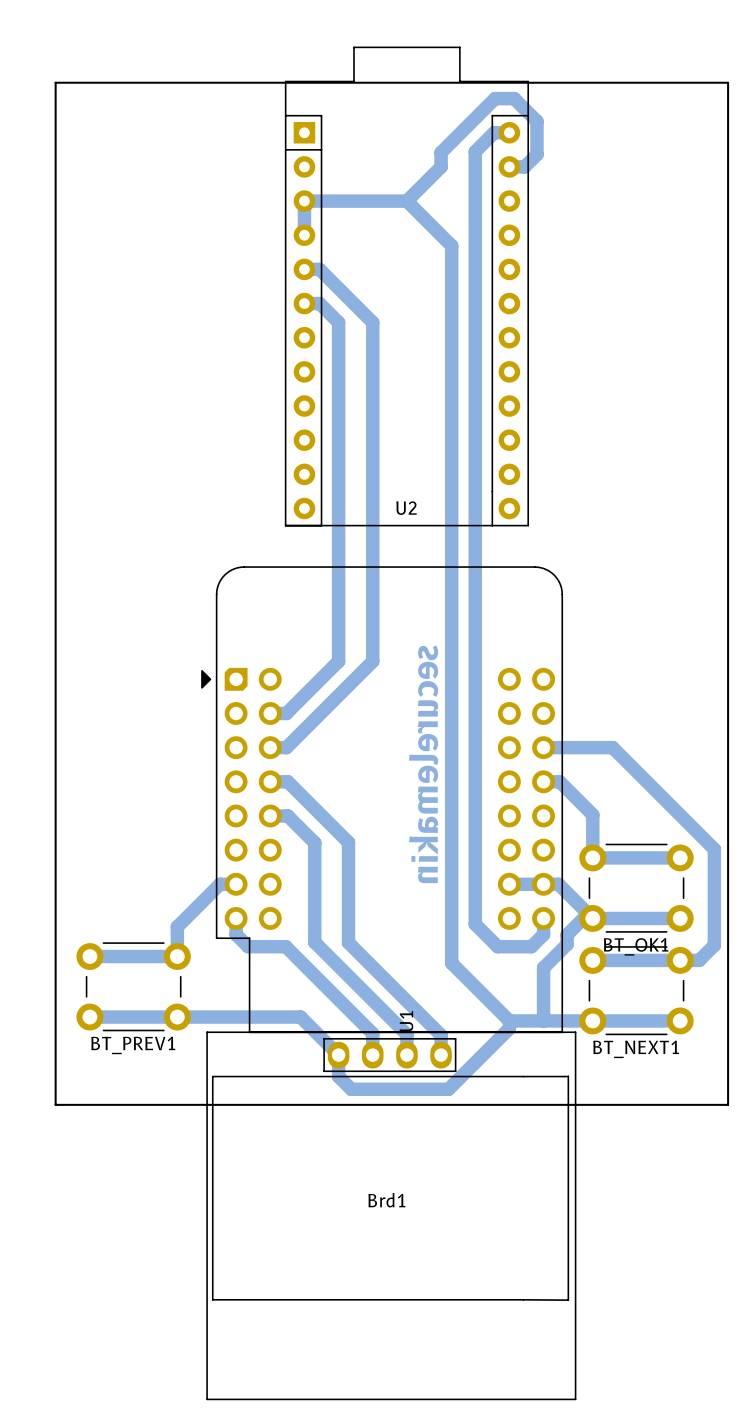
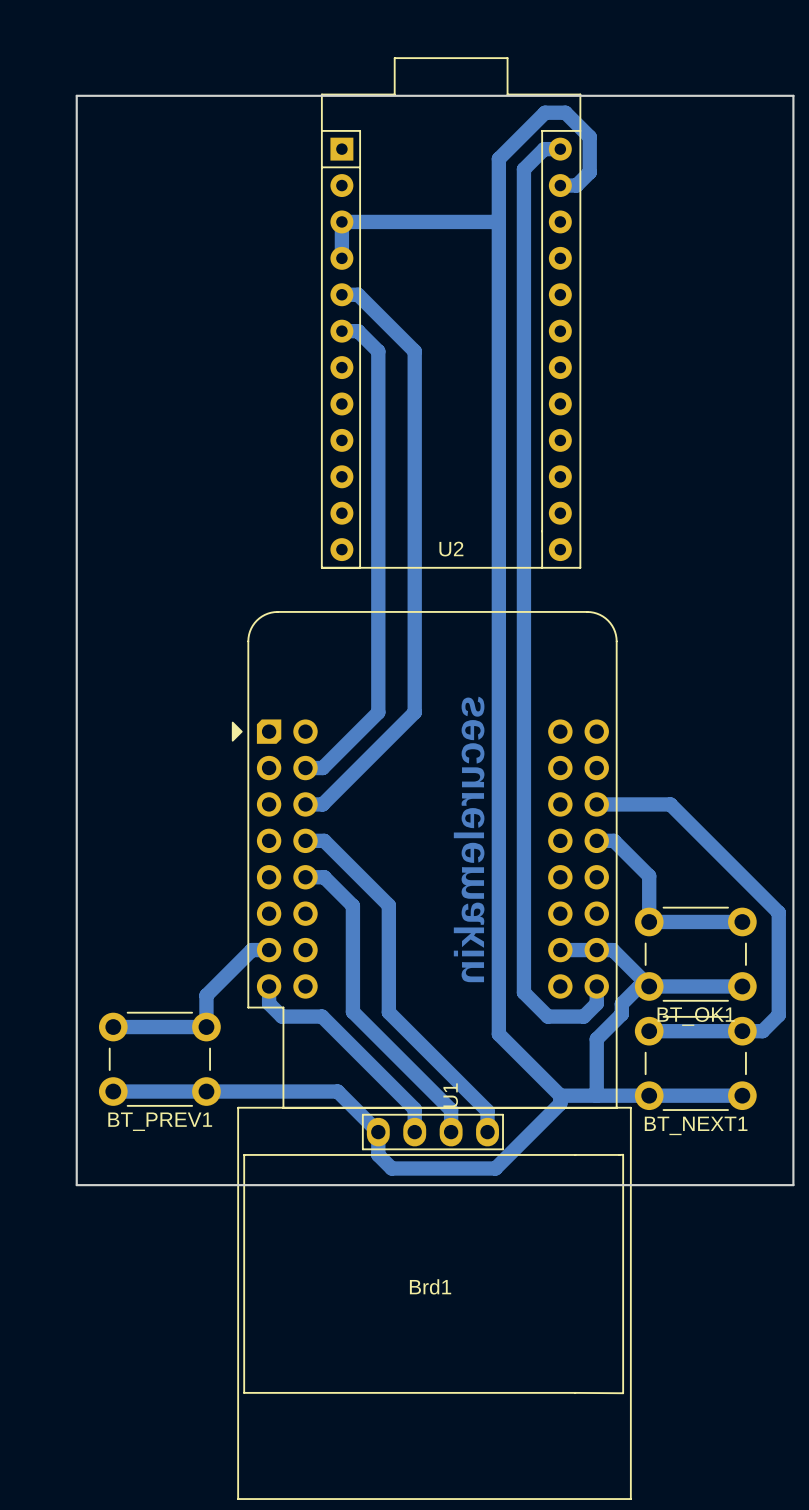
bottom track: (451, 141) (441, 152) (441, 166) (406, 201) (451, 245) -> (498, 158) (498, 269)
bottom track: none -> (451, 221) (495, 221) (498, 224)

